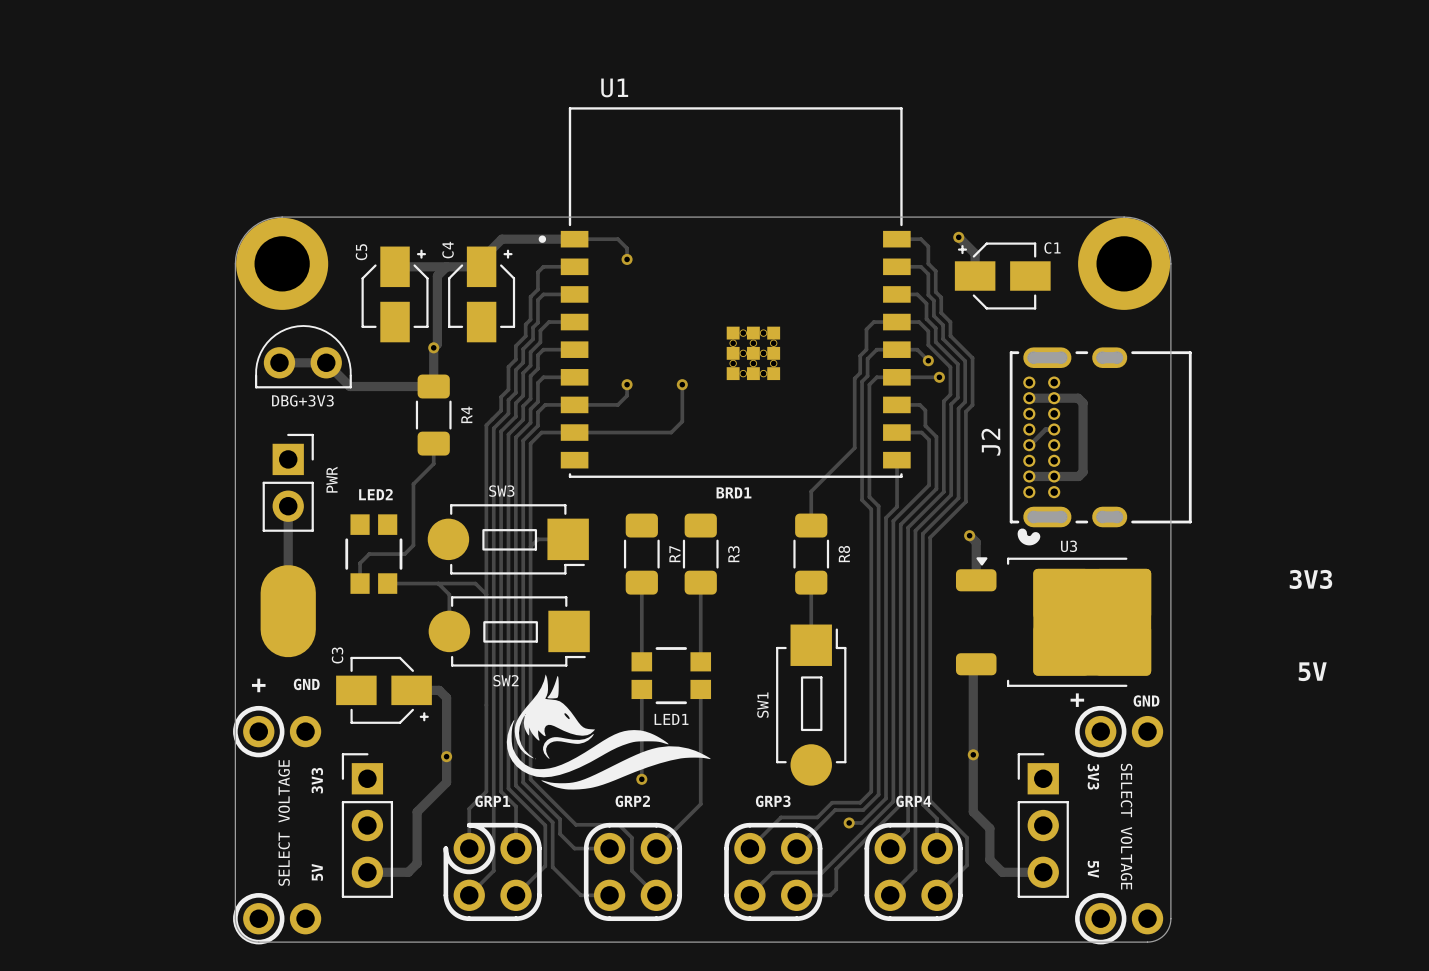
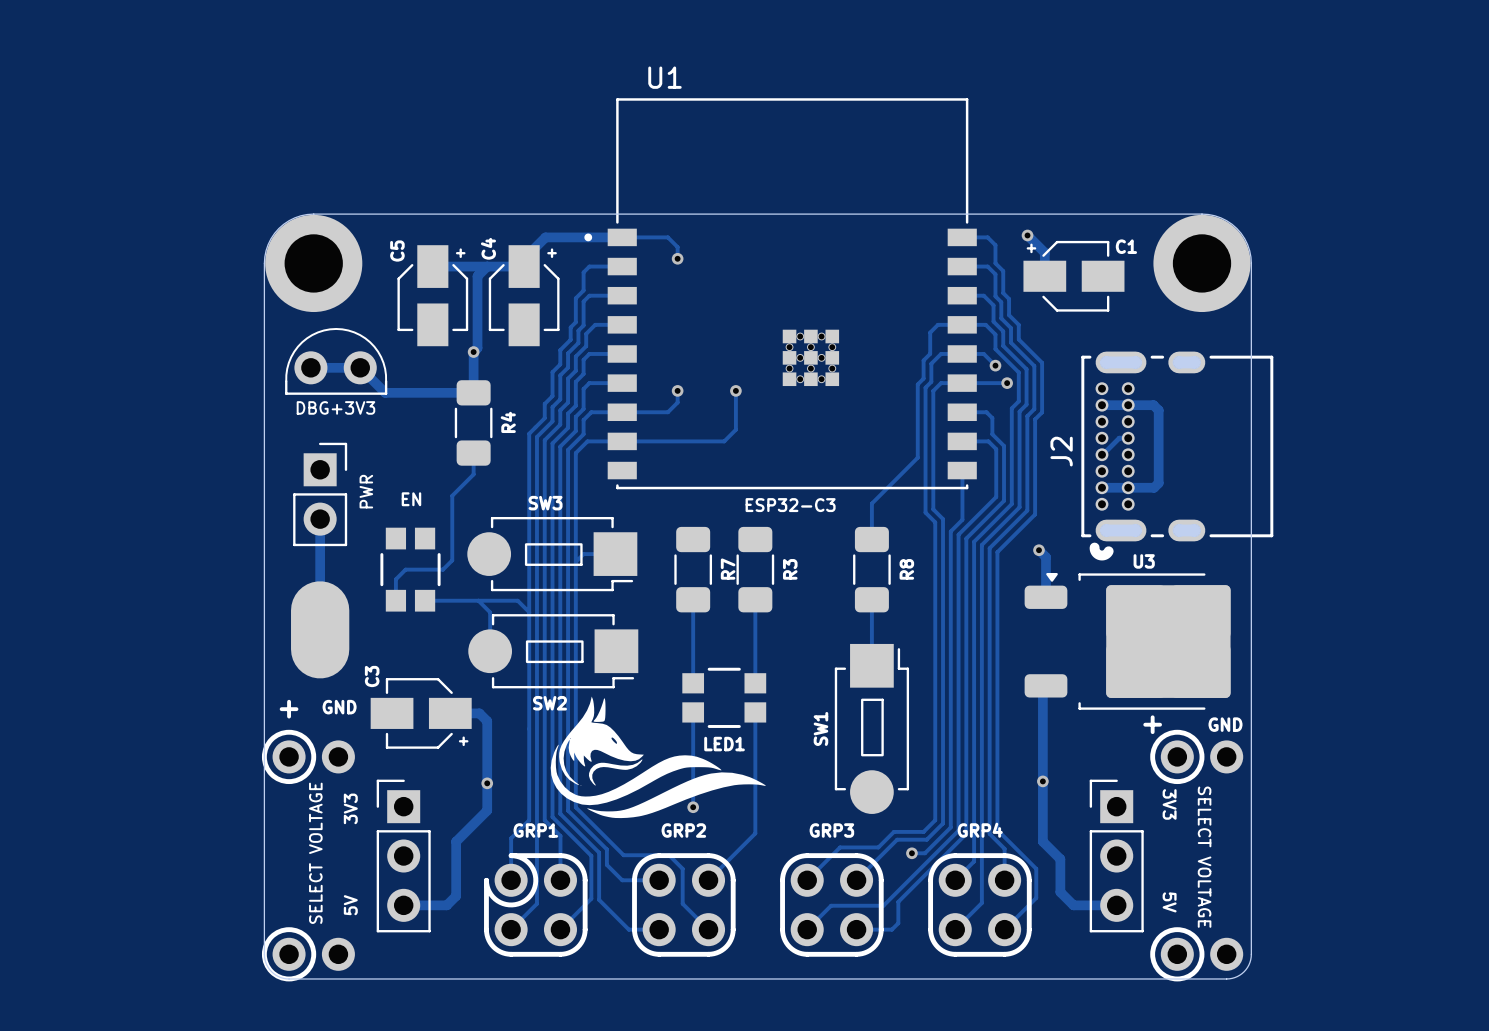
BRD1 name: BRD1 (733, 492) -> ESP32-C3 (790, 505)
LED2 name: LED2 (375, 494) -> EN (411, 499)
text: 3V3 (1310, 579) -> none
text: 5V (1312, 671) -> none

